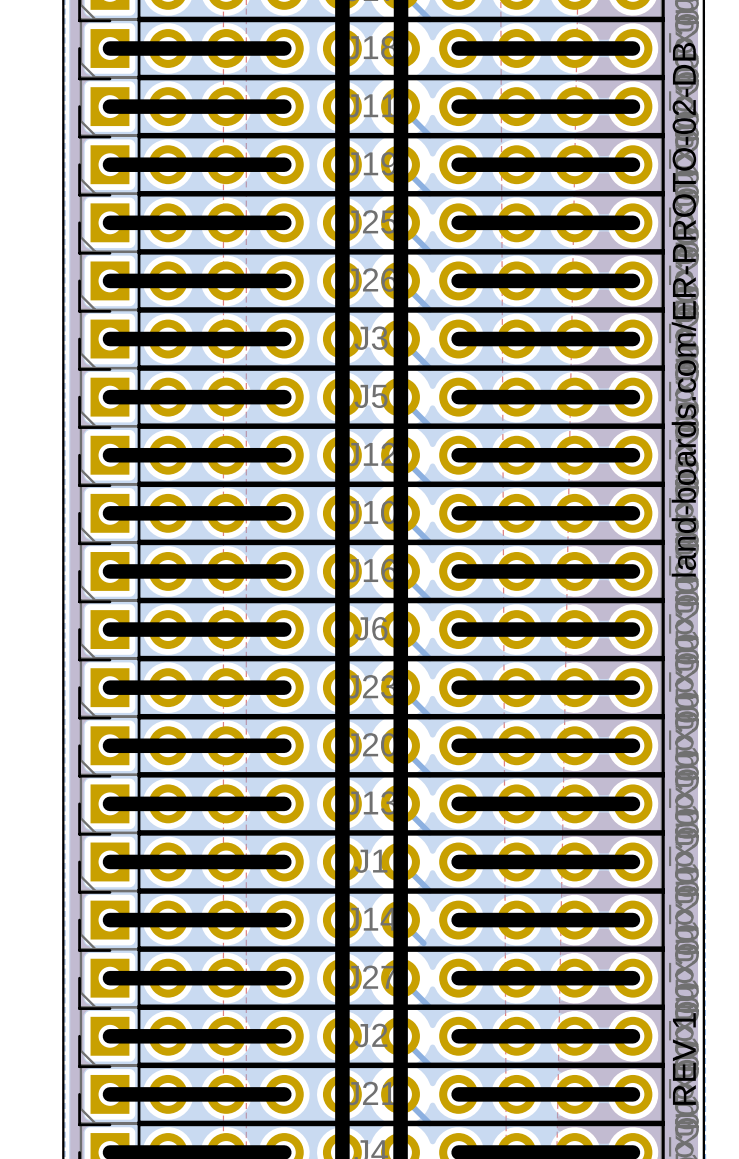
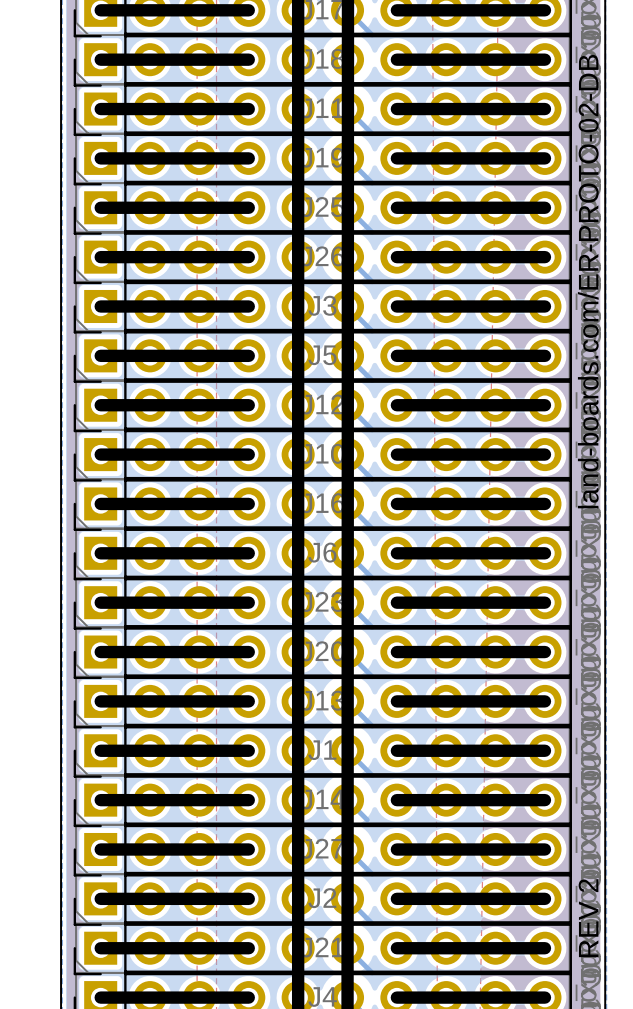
text: REV 1 (684, 1058) -> REV 2 (588, 918)

